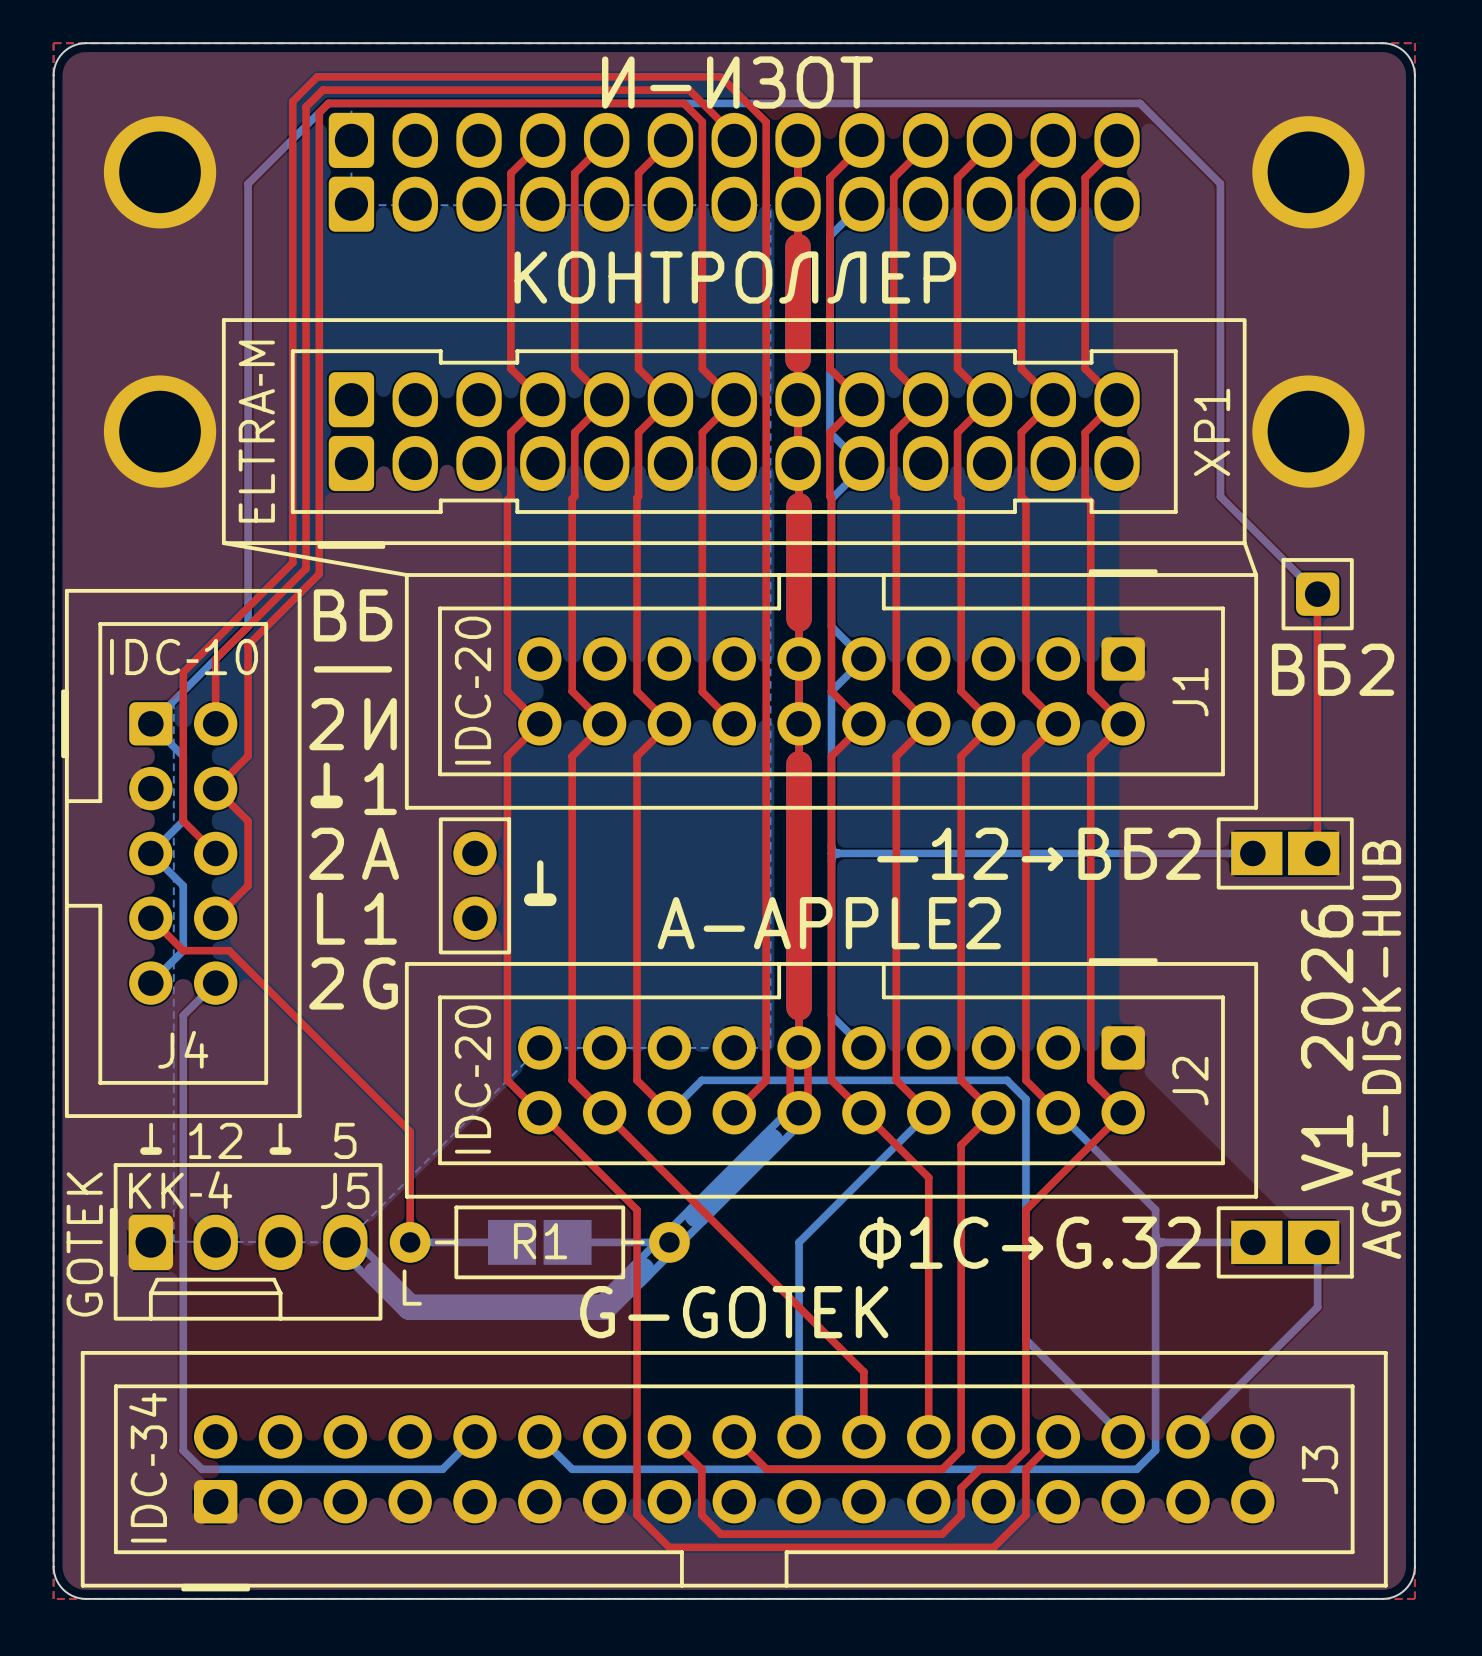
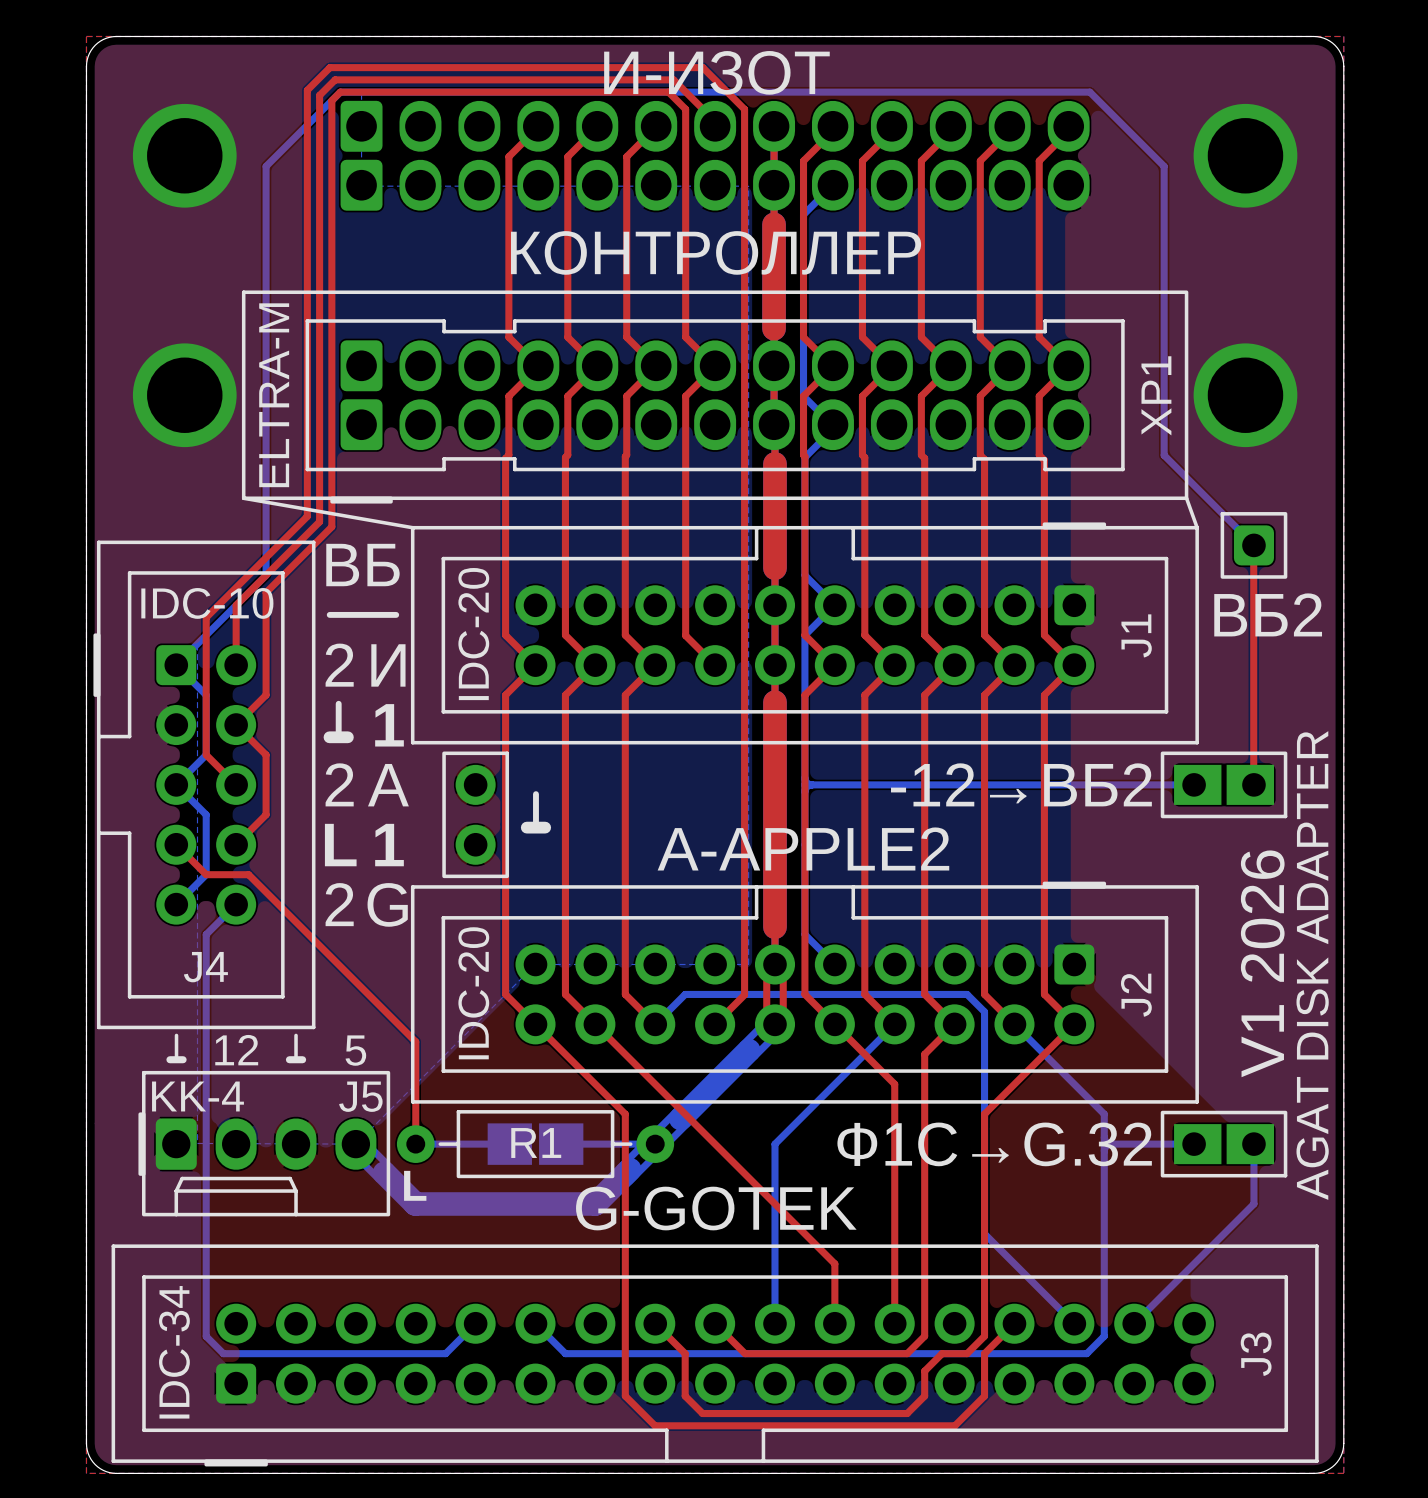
text: AGAT-DISK-HUB (1381, 1049) -> AGAT DISK ADAPTER (1312, 965)
text: GOTEK (84, 1244) -> none

